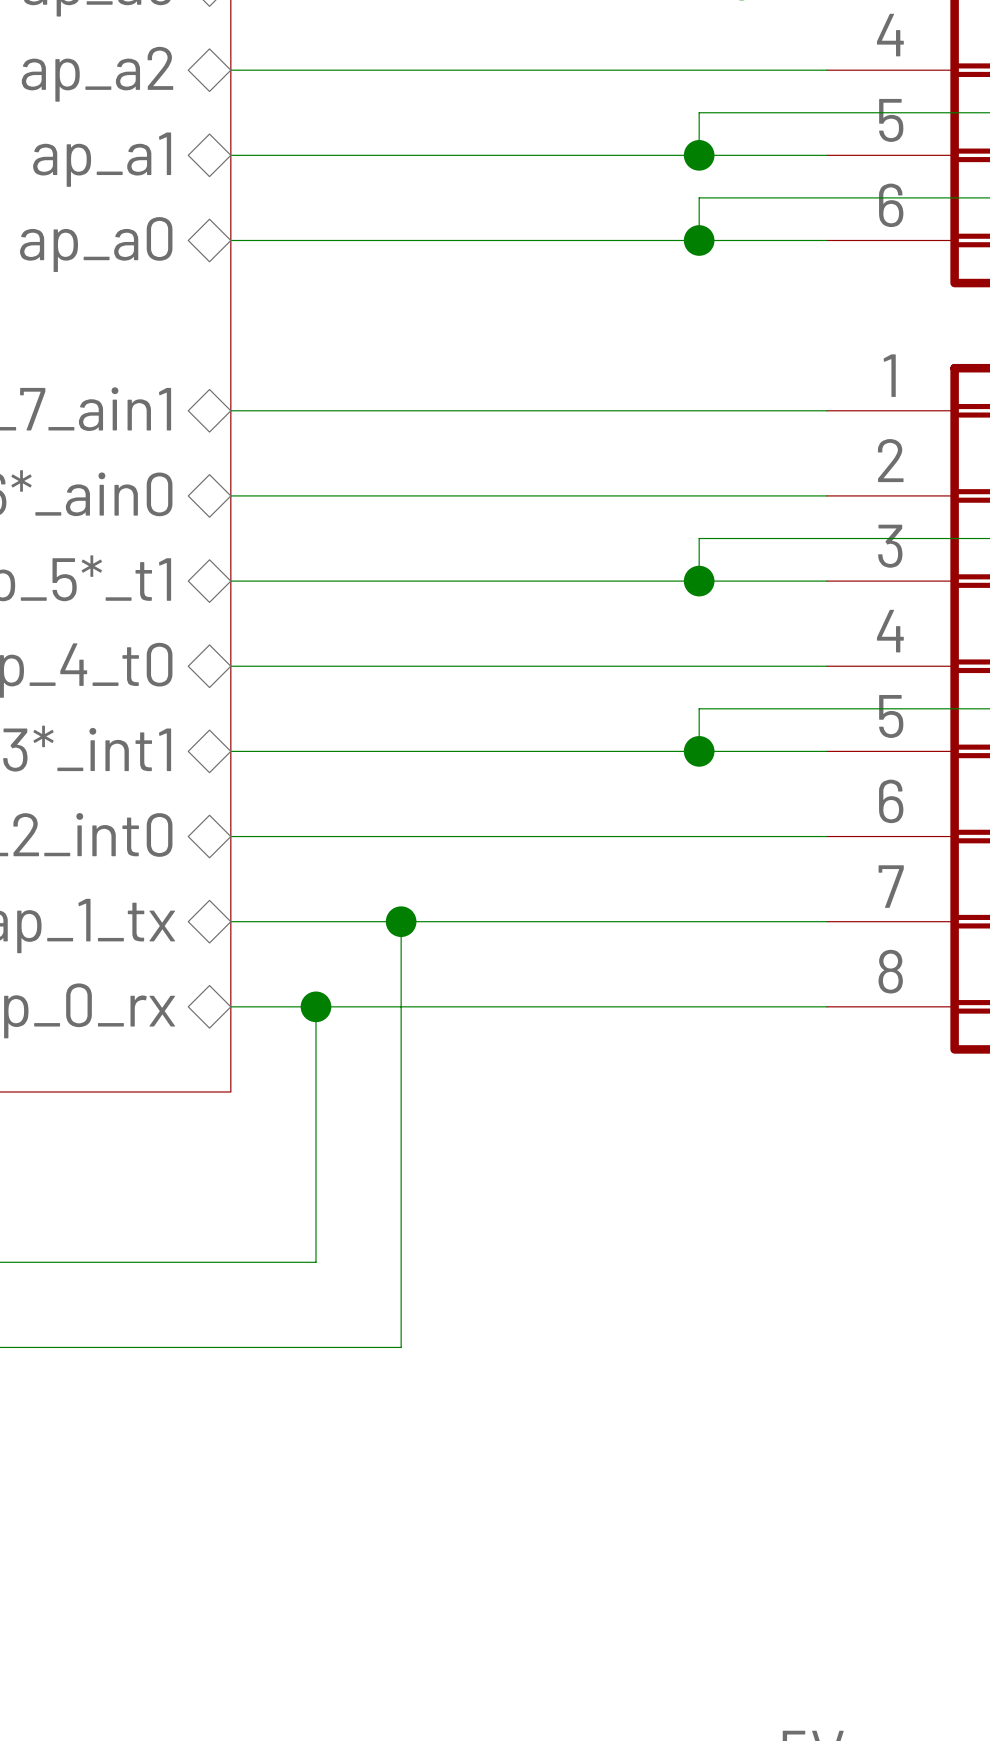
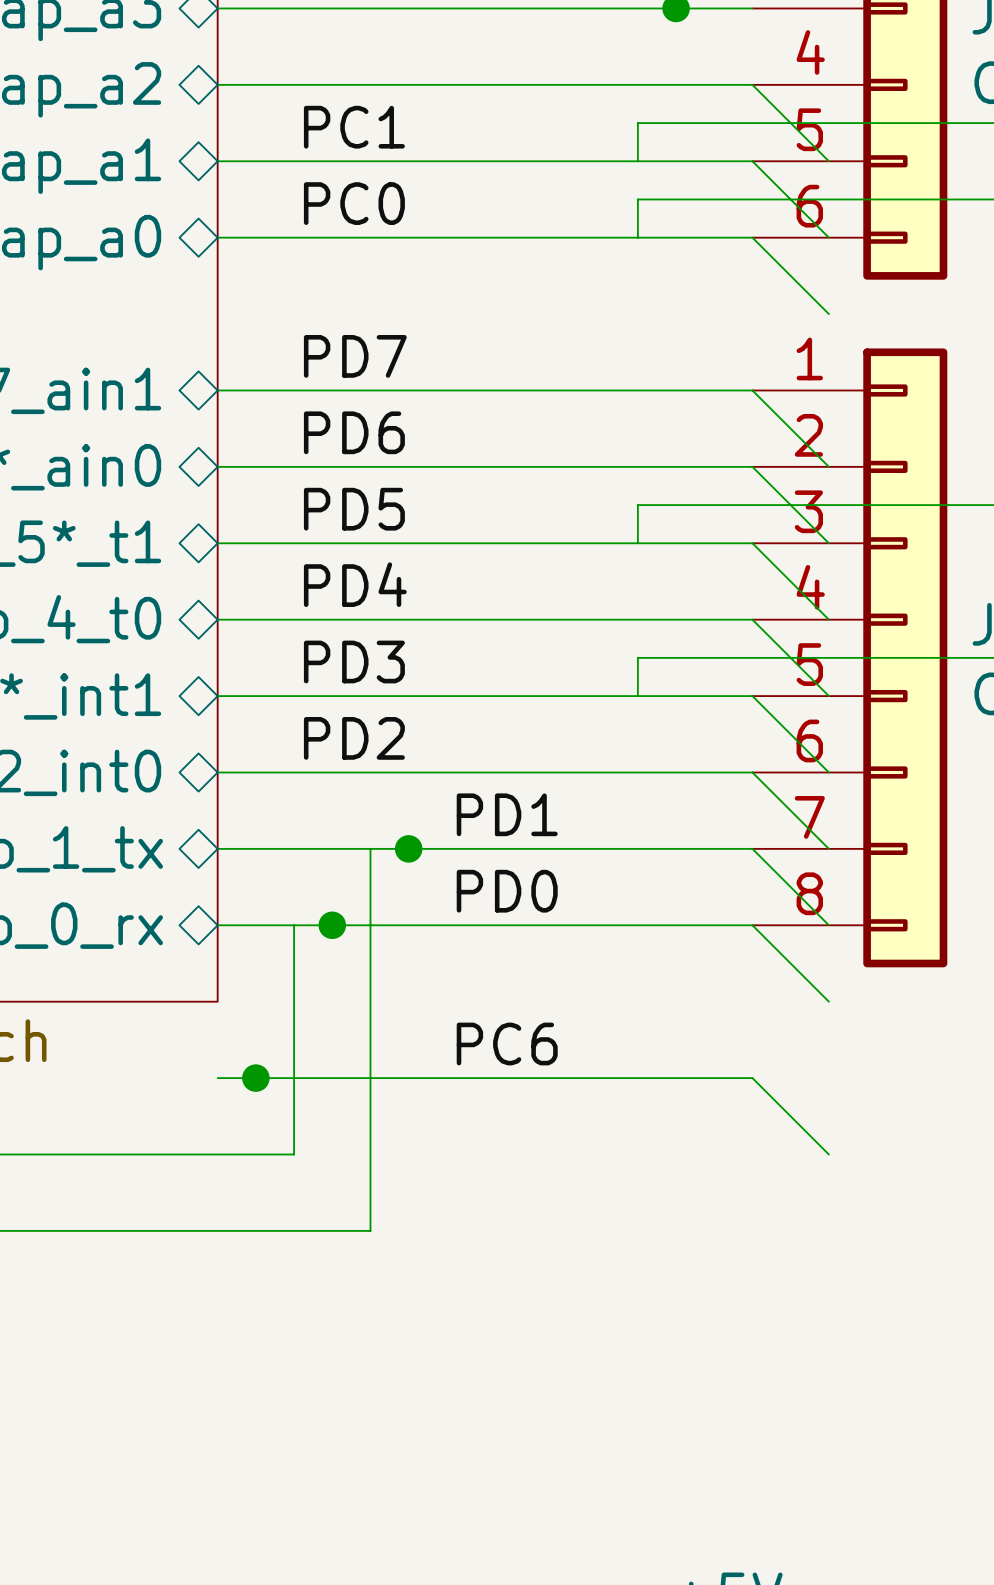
wire: none -> (752, 84) (828, 161)
label: none -> PC1 (354, 127)
junction: (699, 155) -> none
wire: none -> (752, 161) (828, 237)
label: none -> PC0 (354, 203)
junction: (699, 240) -> none
wire: none -> (752, 237) (828, 314)
label: none -> PD7 (355, 356)
wire: none -> (752, 390) (828, 466)
label: none -> PD6 (354, 432)
wire: none -> (752, 466) (828, 543)
label: none -> PD5 (354, 509)
junction: (699, 581) -> none
wire: none -> (752, 543) (828, 619)
label: none -> PD4 (355, 584)
wire: none -> (752, 619) (828, 696)
label: none -> PD3 (354, 662)
junction: (699, 751) -> none
wire: none -> (752, 696) (828, 772)
label: none -> PD2 (354, 738)
wire: none -> (752, 772) (828, 848)
label: none -> PD1 (507, 814)
junction position: (401, 921) -> (408, 848)
wire: none -> (752, 848) (828, 925)
label: none -> PD0 (507, 891)
junction position: (315, 1006) -> (332, 925)
wire: none -> (752, 925) (828, 1001)
label: none -> PC6 (507, 1044)
wire: none -> (217, 1078) (752, 1078) (828, 1154)
junction: none -> (255, 1078)

